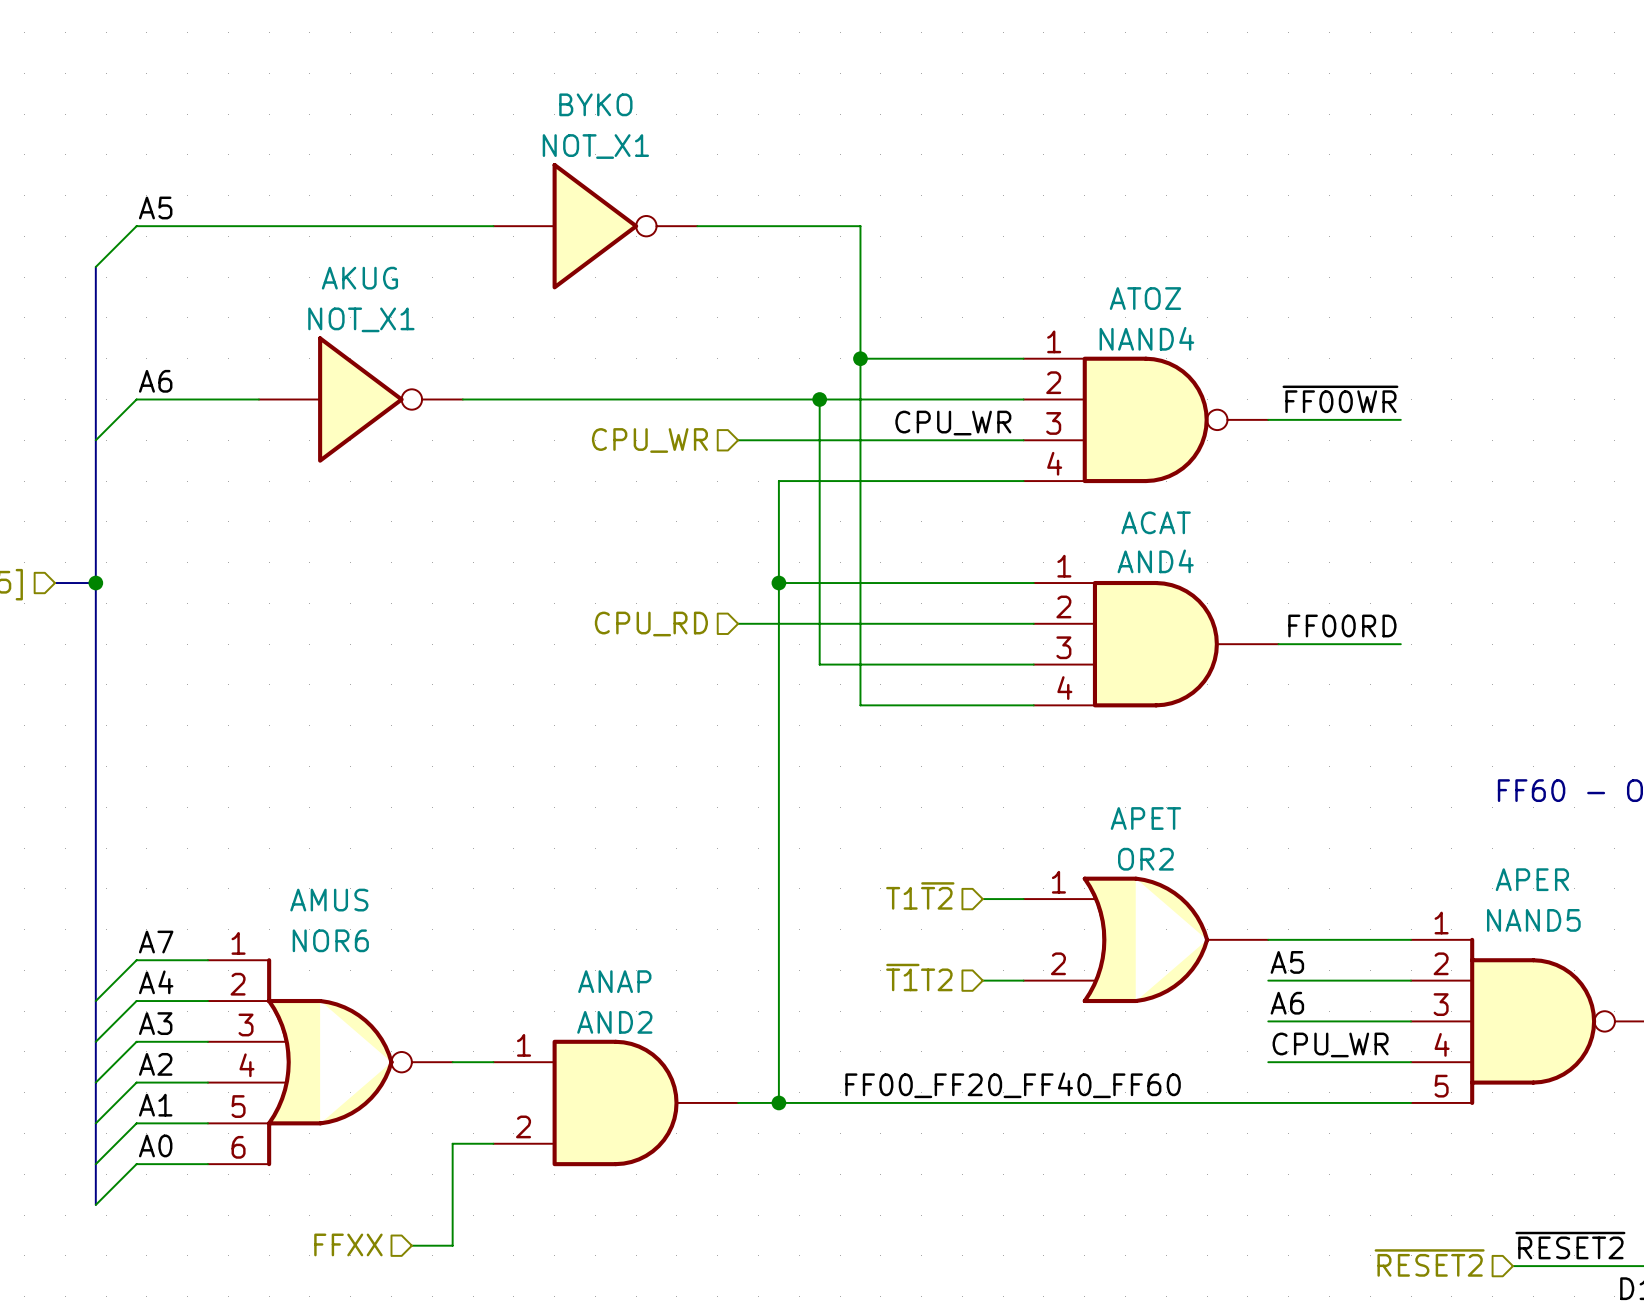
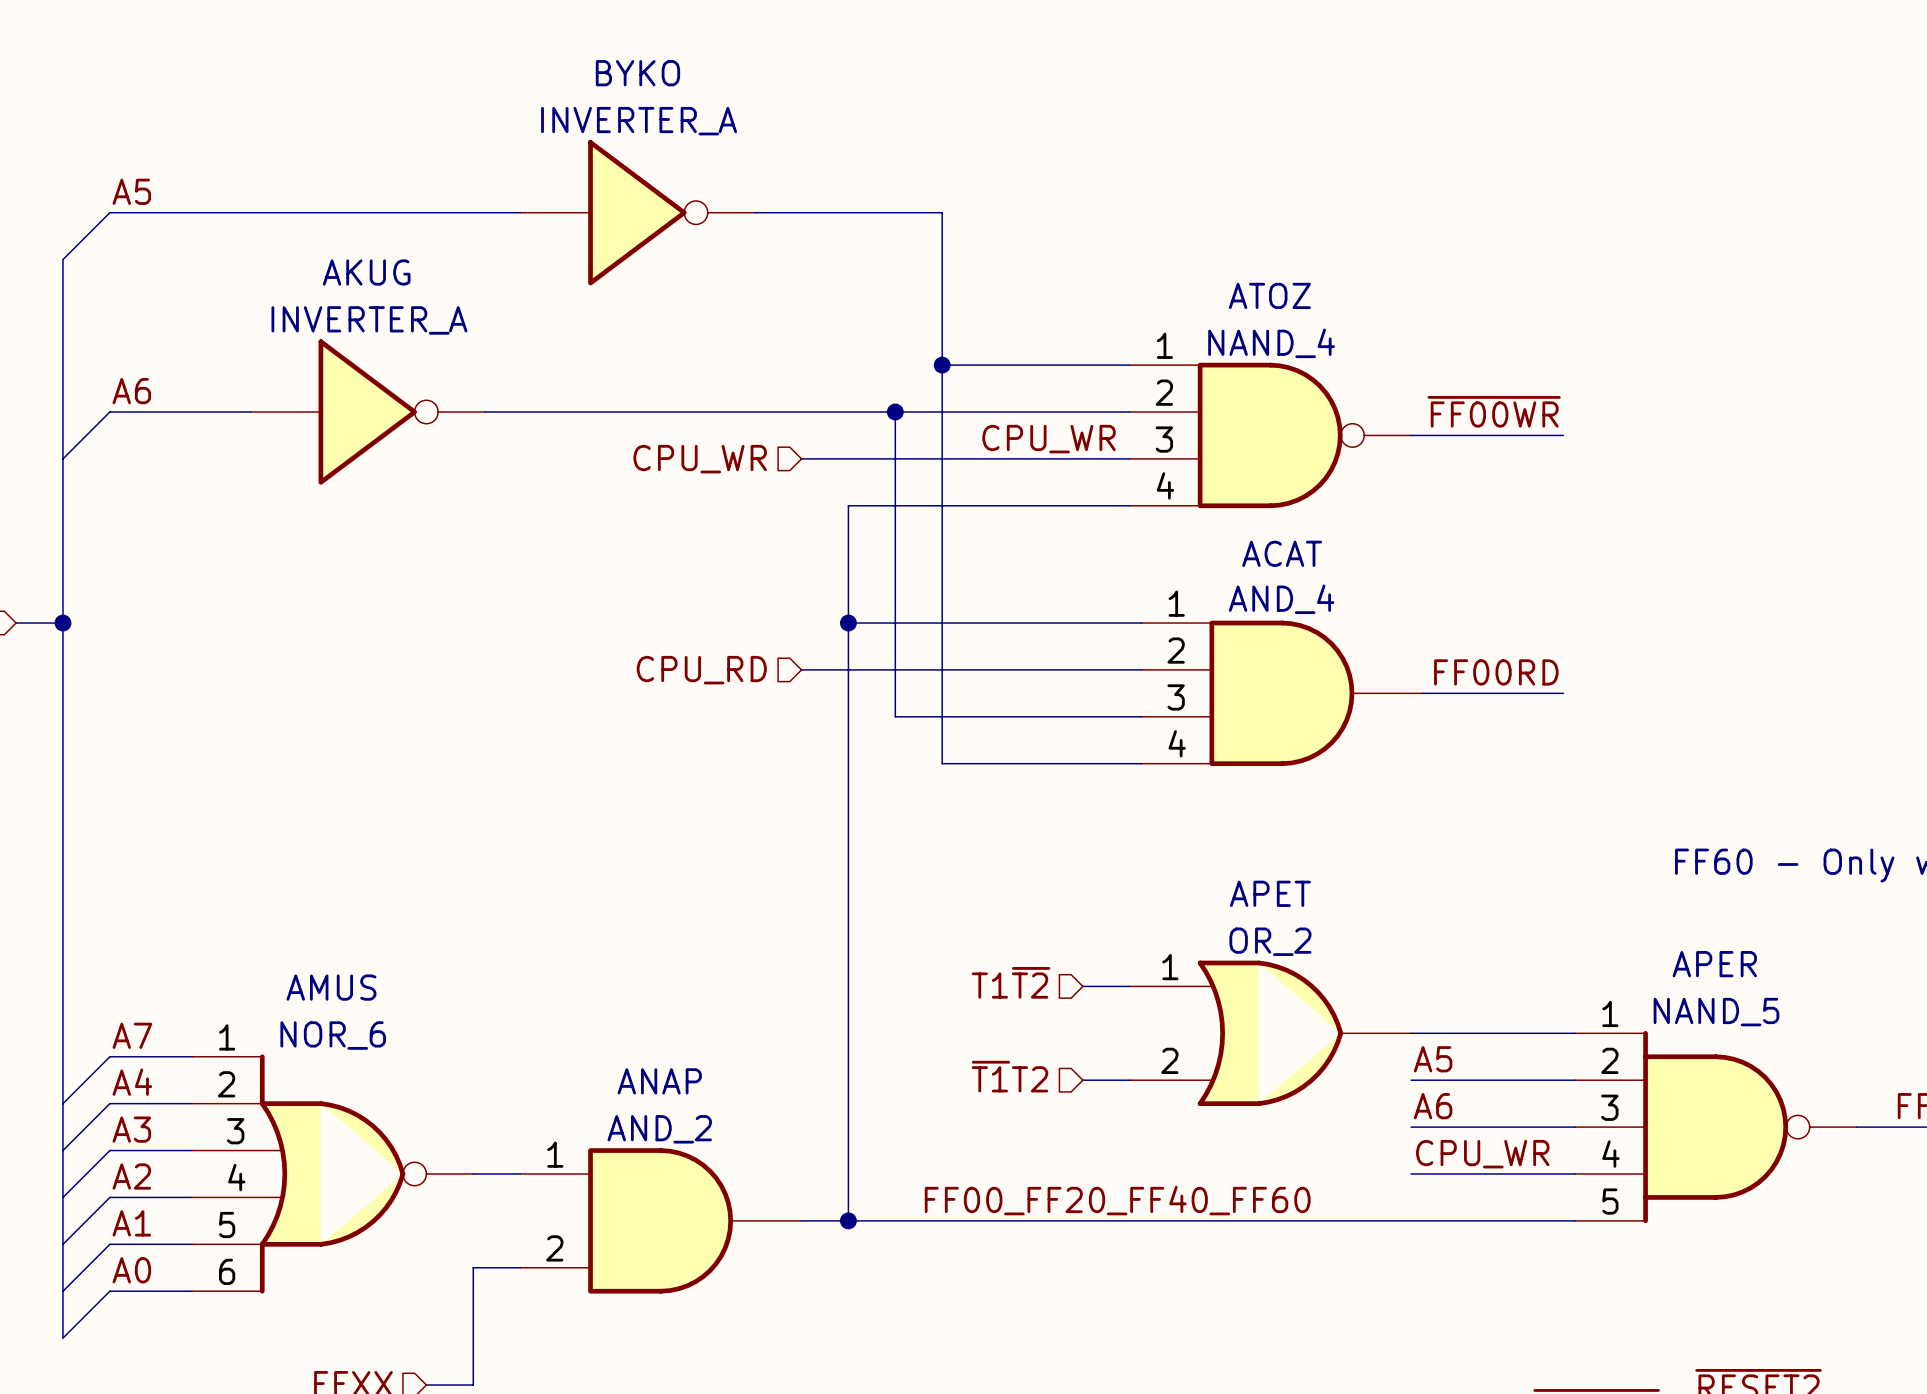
BYKO value: NOT_X1 (595, 146) -> INVERTER_A (639, 121)
AKUG value: NOT_X1 (361, 319) -> INVERTER_A (369, 320)
ATOZ value: NAND4 (1146, 338) -> NAND_4 (1271, 343)
ACAT value: AND4 (1155, 561) -> AND_4 (1281, 599)
APET value: OR2 (1145, 859) -> OR_2 (1270, 941)
APER value: NAND5 (1533, 920) -> NAND_5 (1716, 1012)
AMUS value: NOR6 (330, 940) -> NOR_6 (333, 1035)
ANAP value: AND2 (614, 1022) -> AND_2 (659, 1129)

